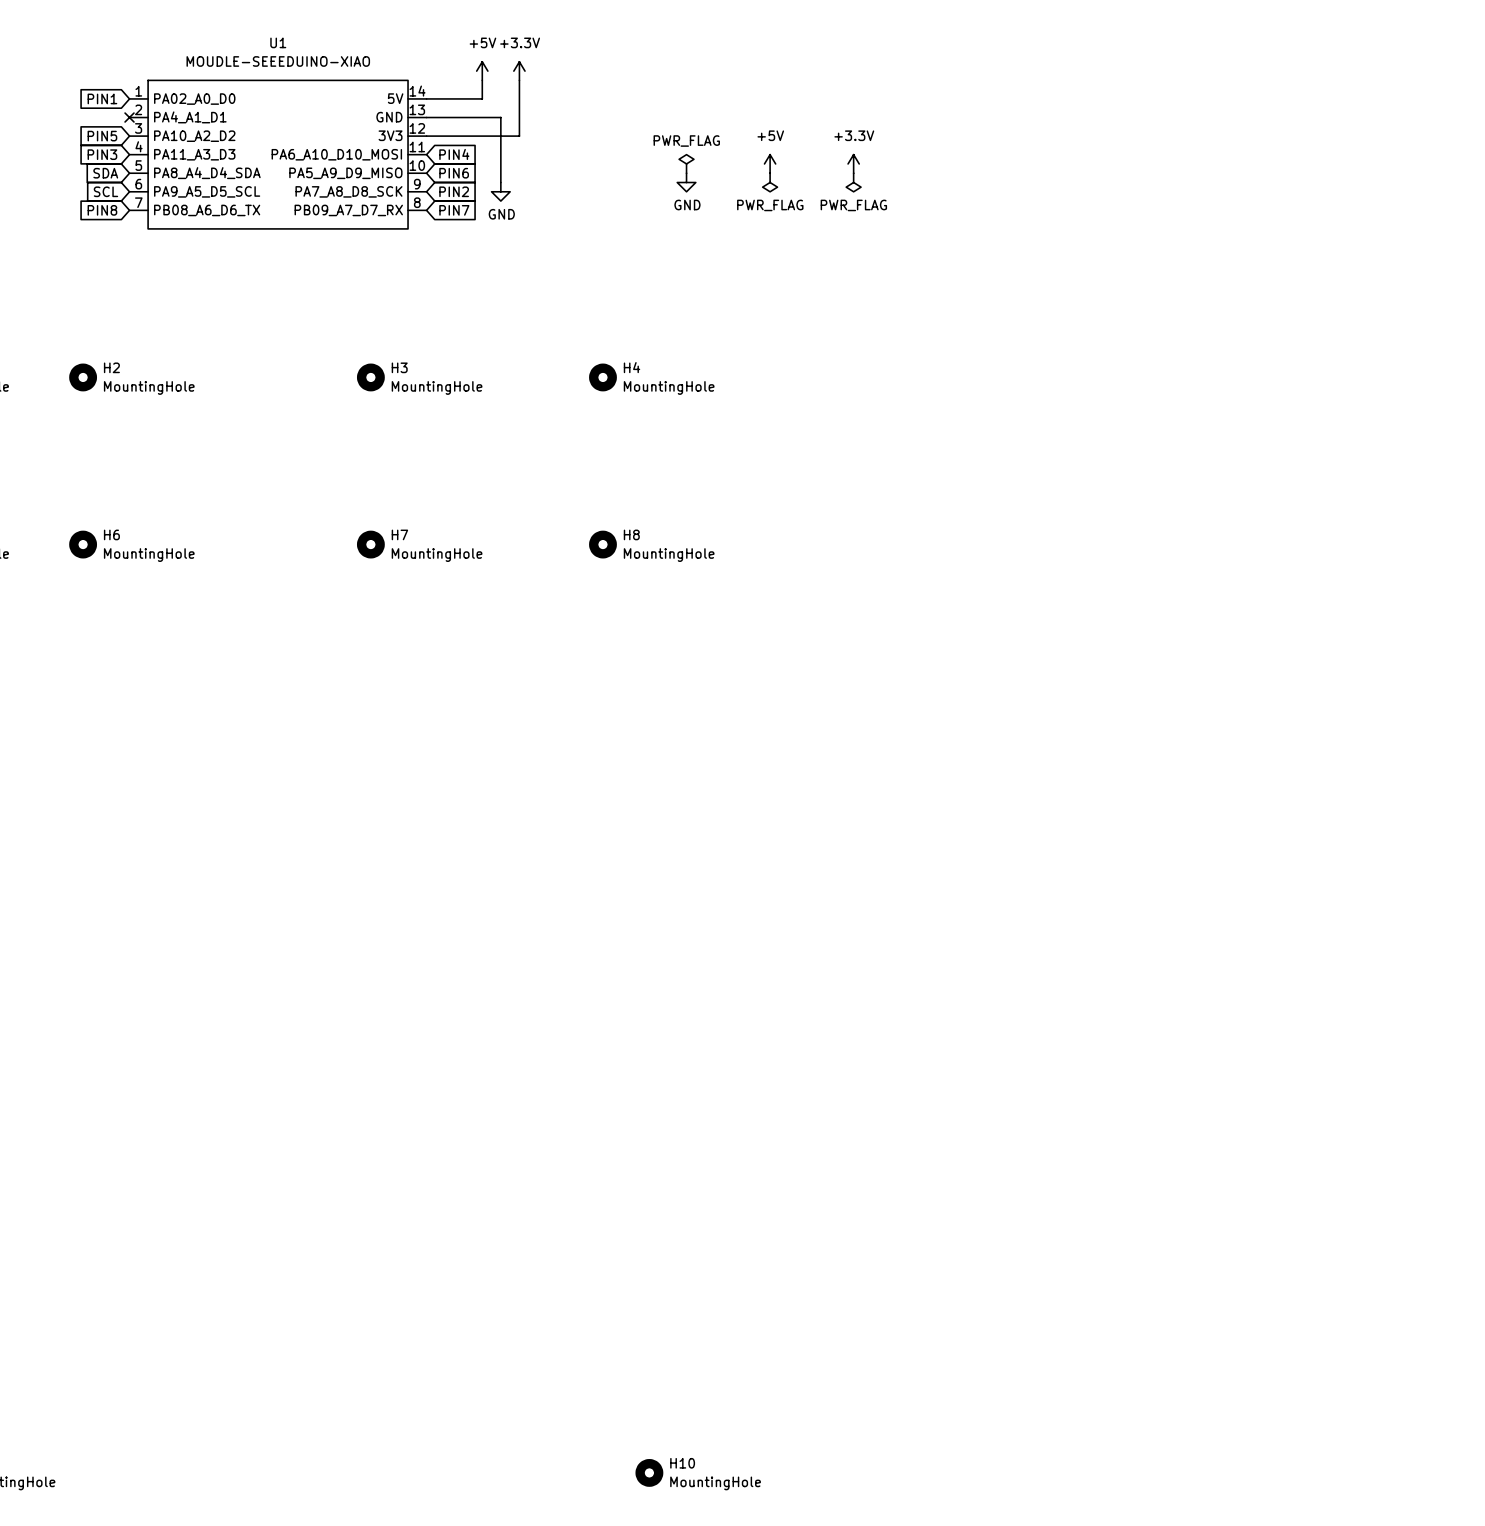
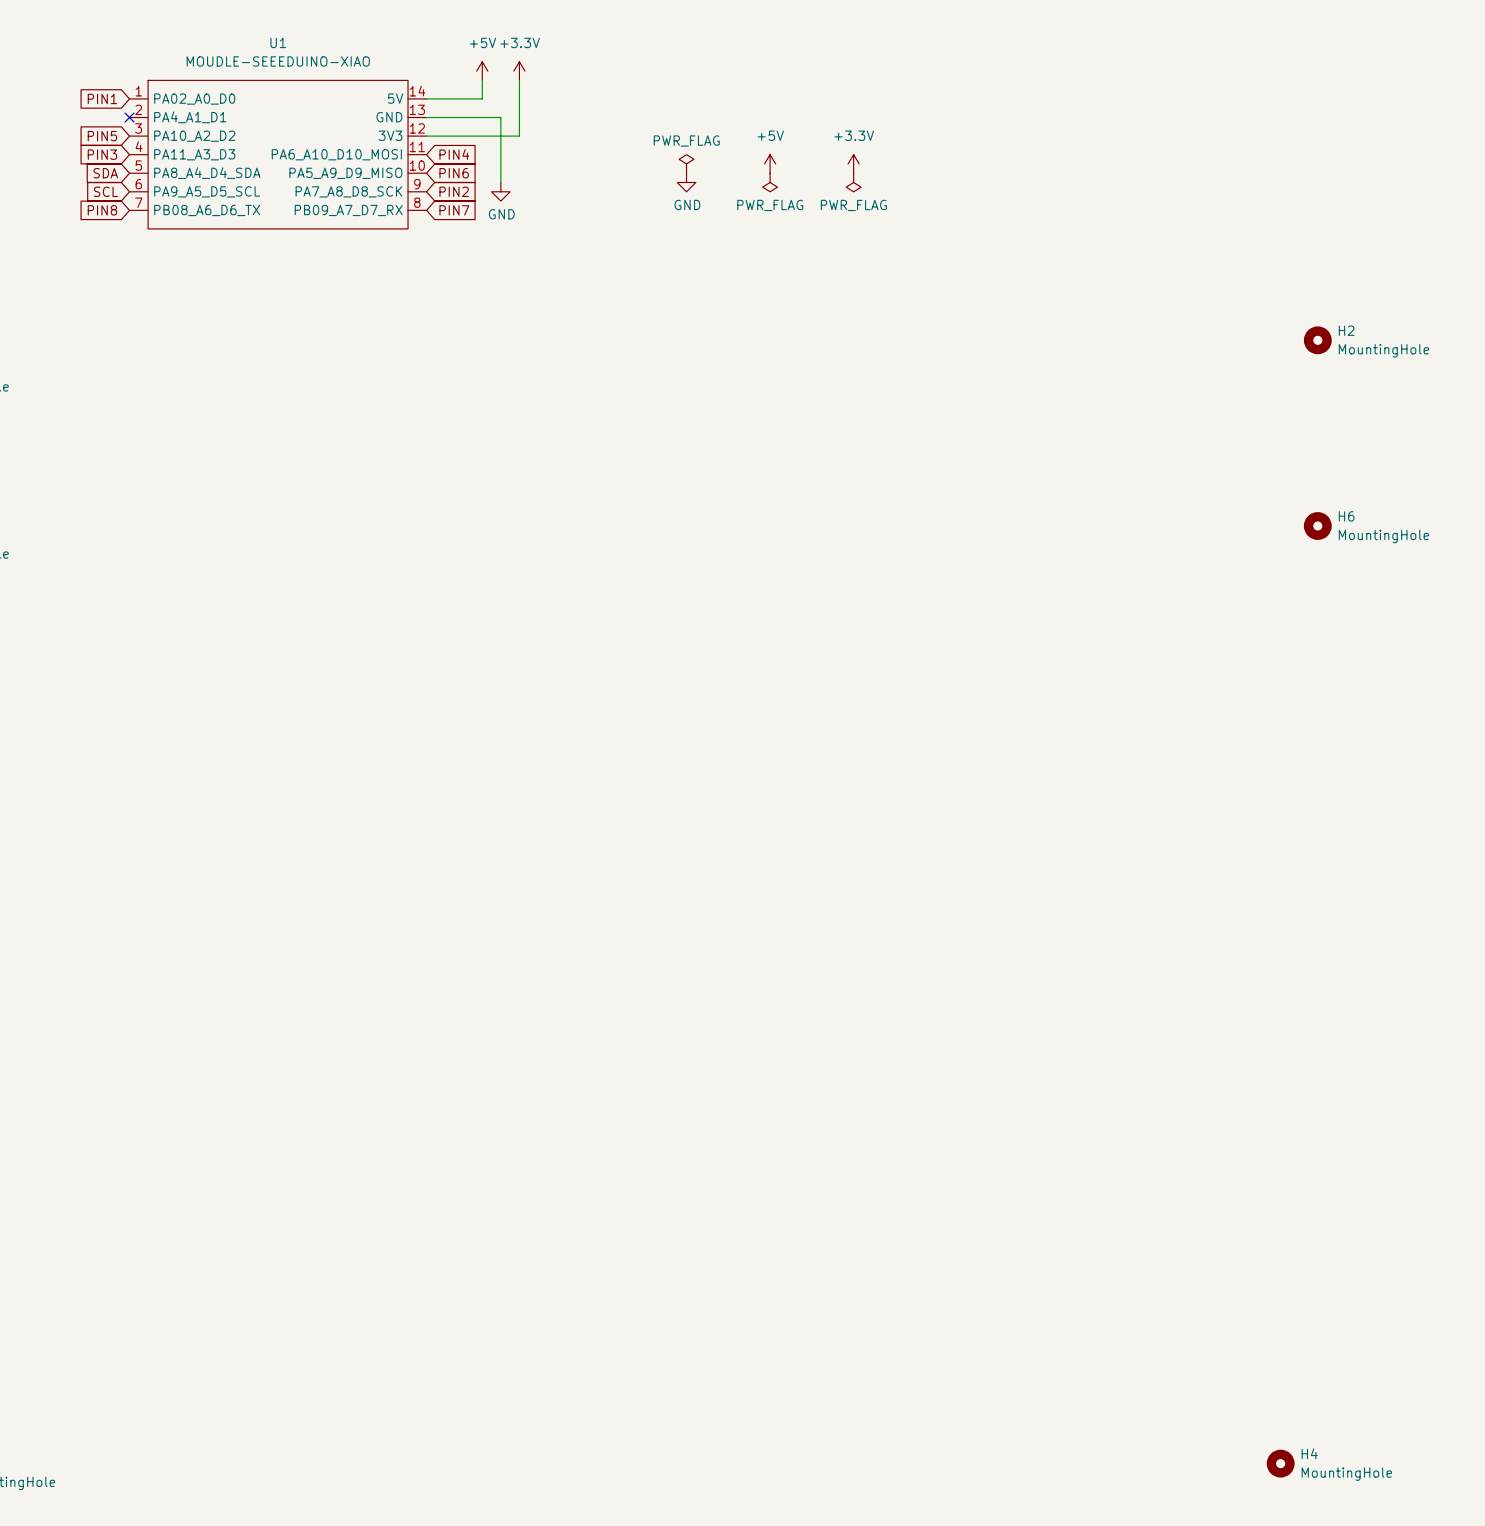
H2 position: (83, 377) -> (1317, 340)
H3: MountingHole (370, 377) -> none
H4 position: (602, 377) -> (1280, 1463)
H6 position: (83, 544) -> (1317, 526)
H7: MountingHole (370, 544) -> none
H8: MountingHole (602, 544) -> none
H10: MountingHole (649, 1472) -> none

